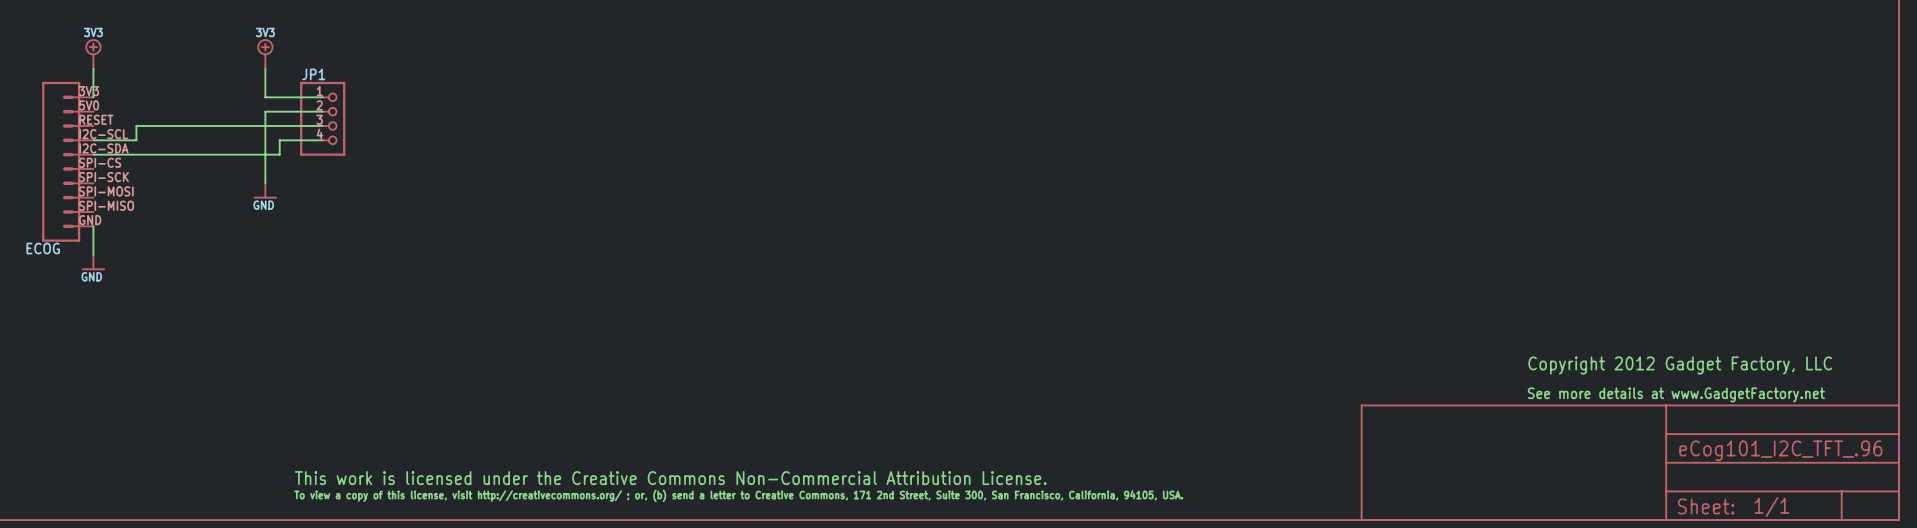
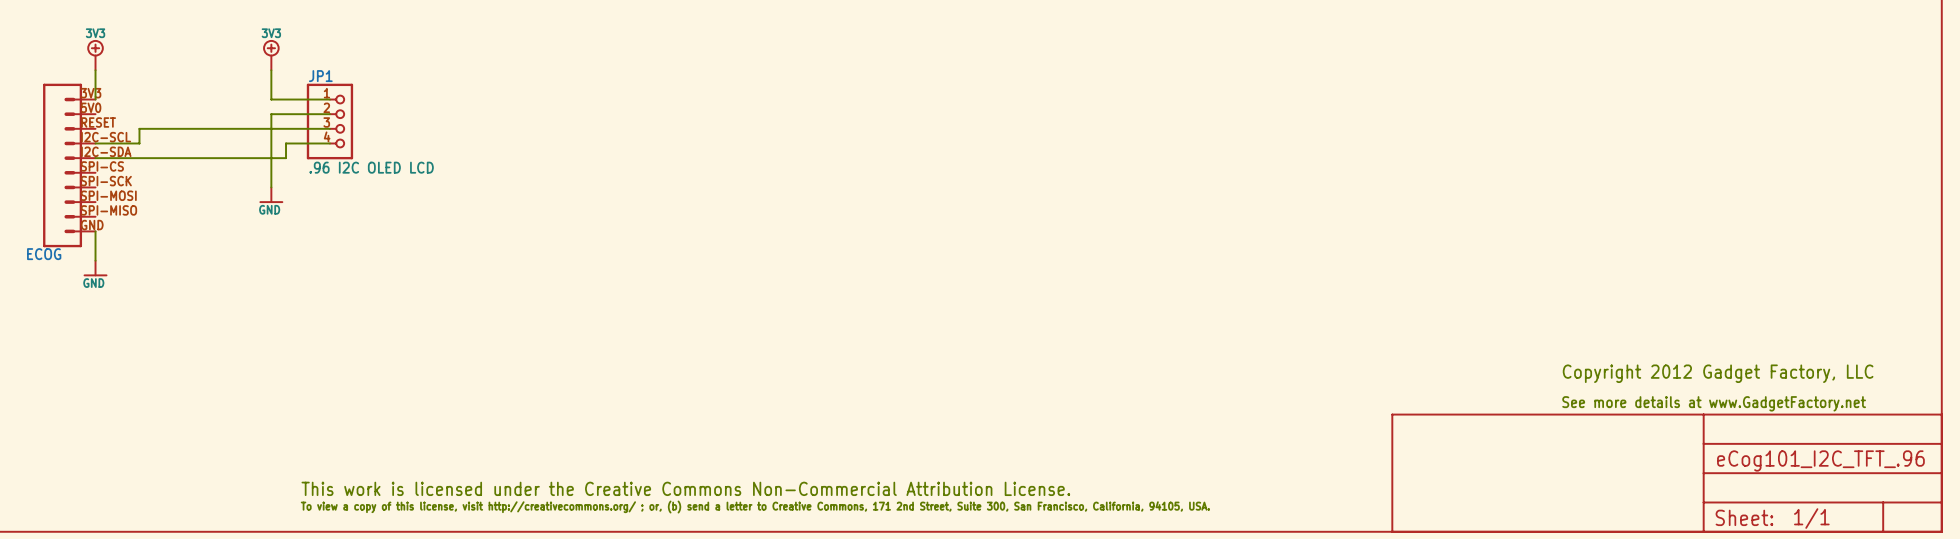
JP1 value: none -> .96 I2C OLED LCD (371, 167)

